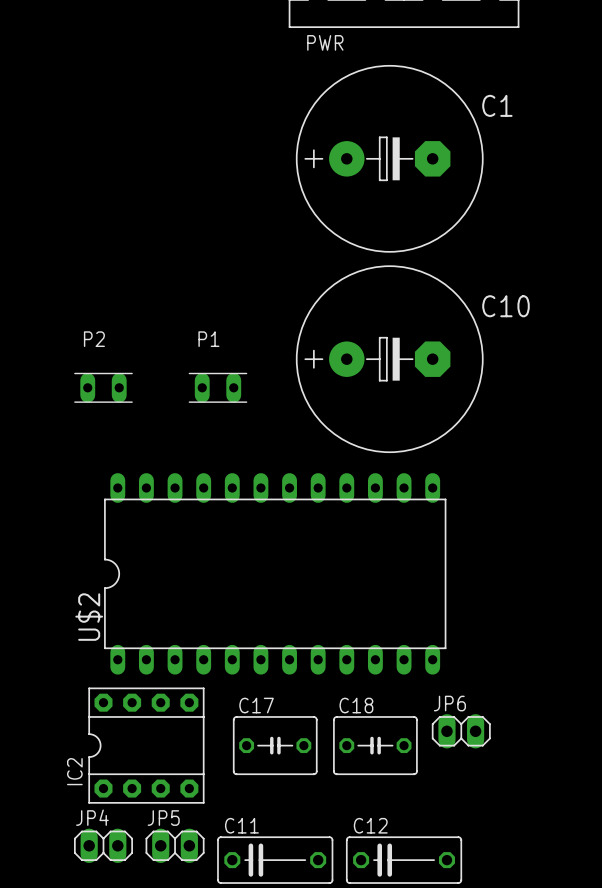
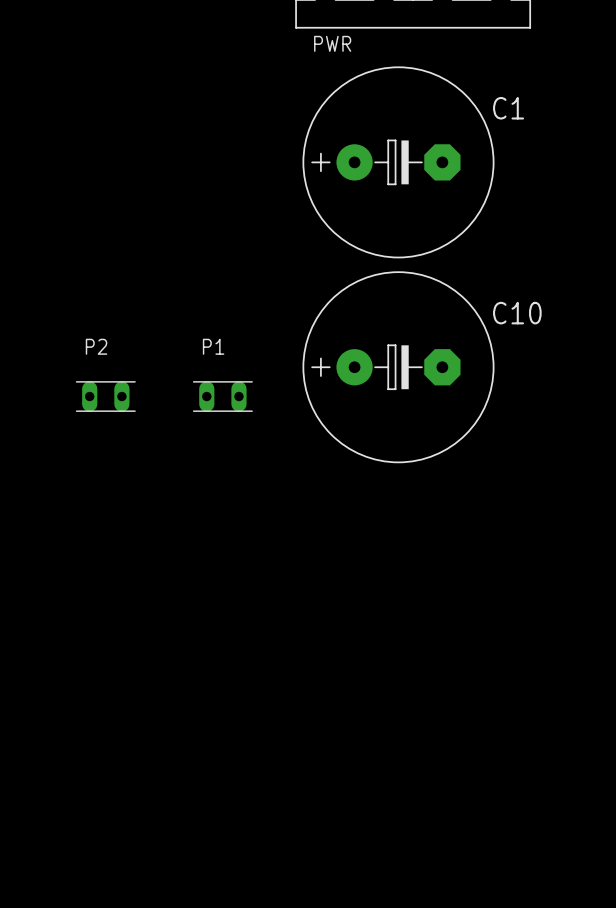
U$2: (275, 573) -> none
JP6: (461, 731) -> none
IC2: (146, 745) -> none
C17: (275, 745) -> none
C18: (375, 745) -> none
JP4: (103, 845) -> none
JP5: (175, 845) -> none
C11: (275, 860) -> none
C12: (404, 860) -> none

